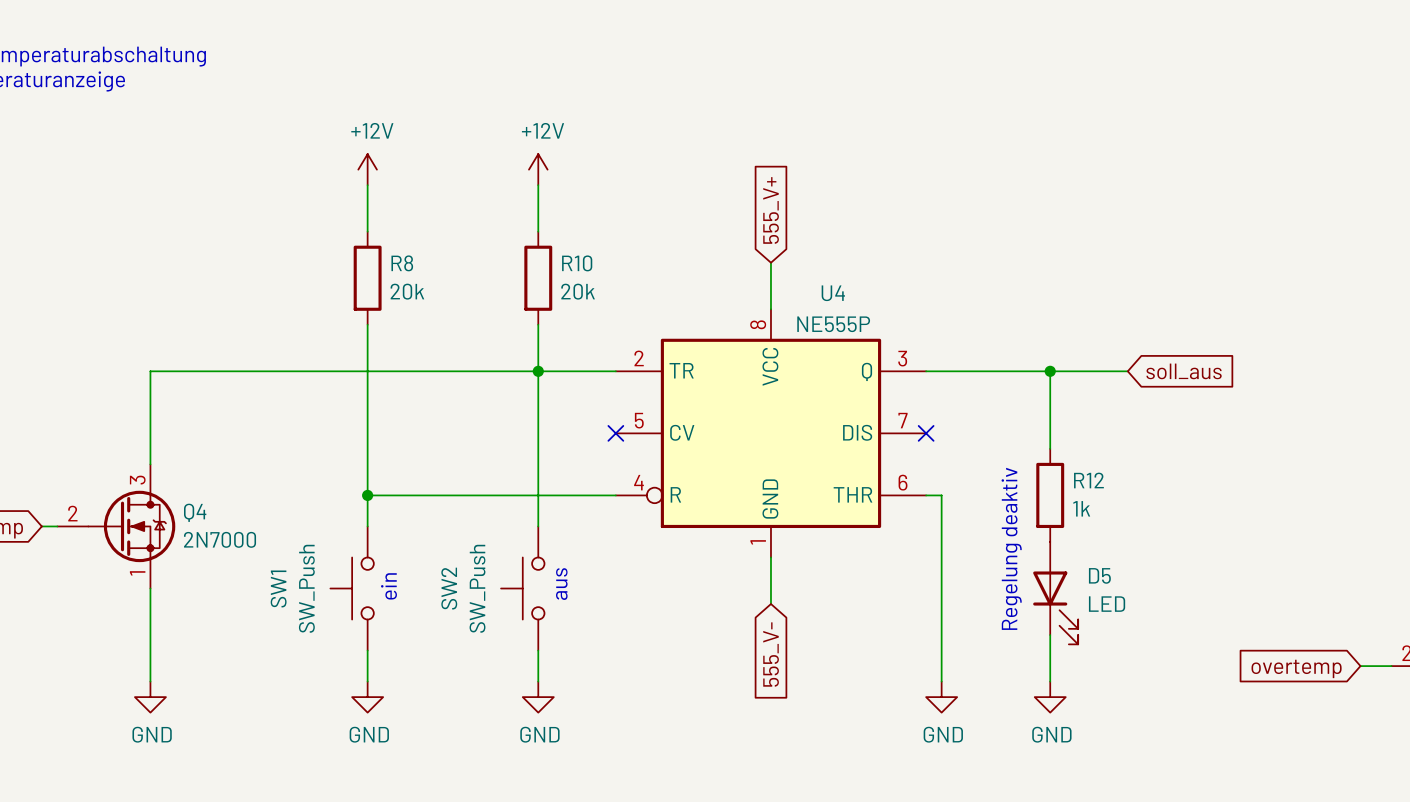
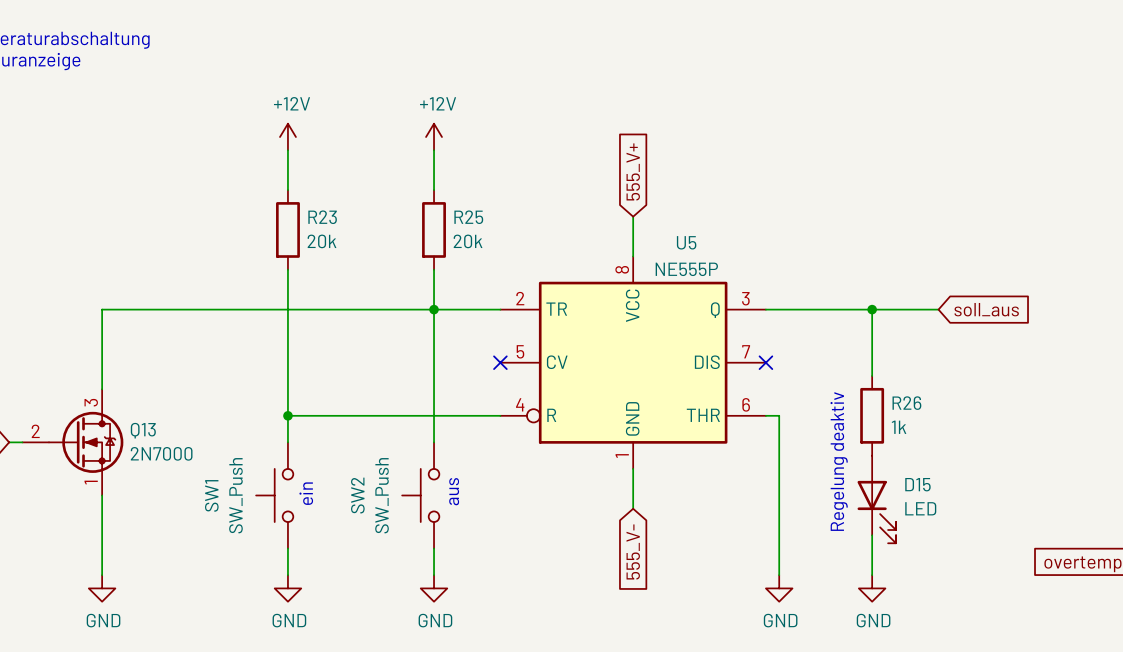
R8 name: R8 (402, 263) -> R23 (322, 217)
R10 name: R10 (577, 263) -> R25 (468, 217)
U4 name: U4 (833, 293) -> U5 (686, 242)
R12 name: R12 (1088, 480) -> R26 (906, 403)
Q4 name: Q4 (195, 512) -> Q13 (143, 430)
D5 name: D5 (1099, 575) -> D15 (917, 484)

